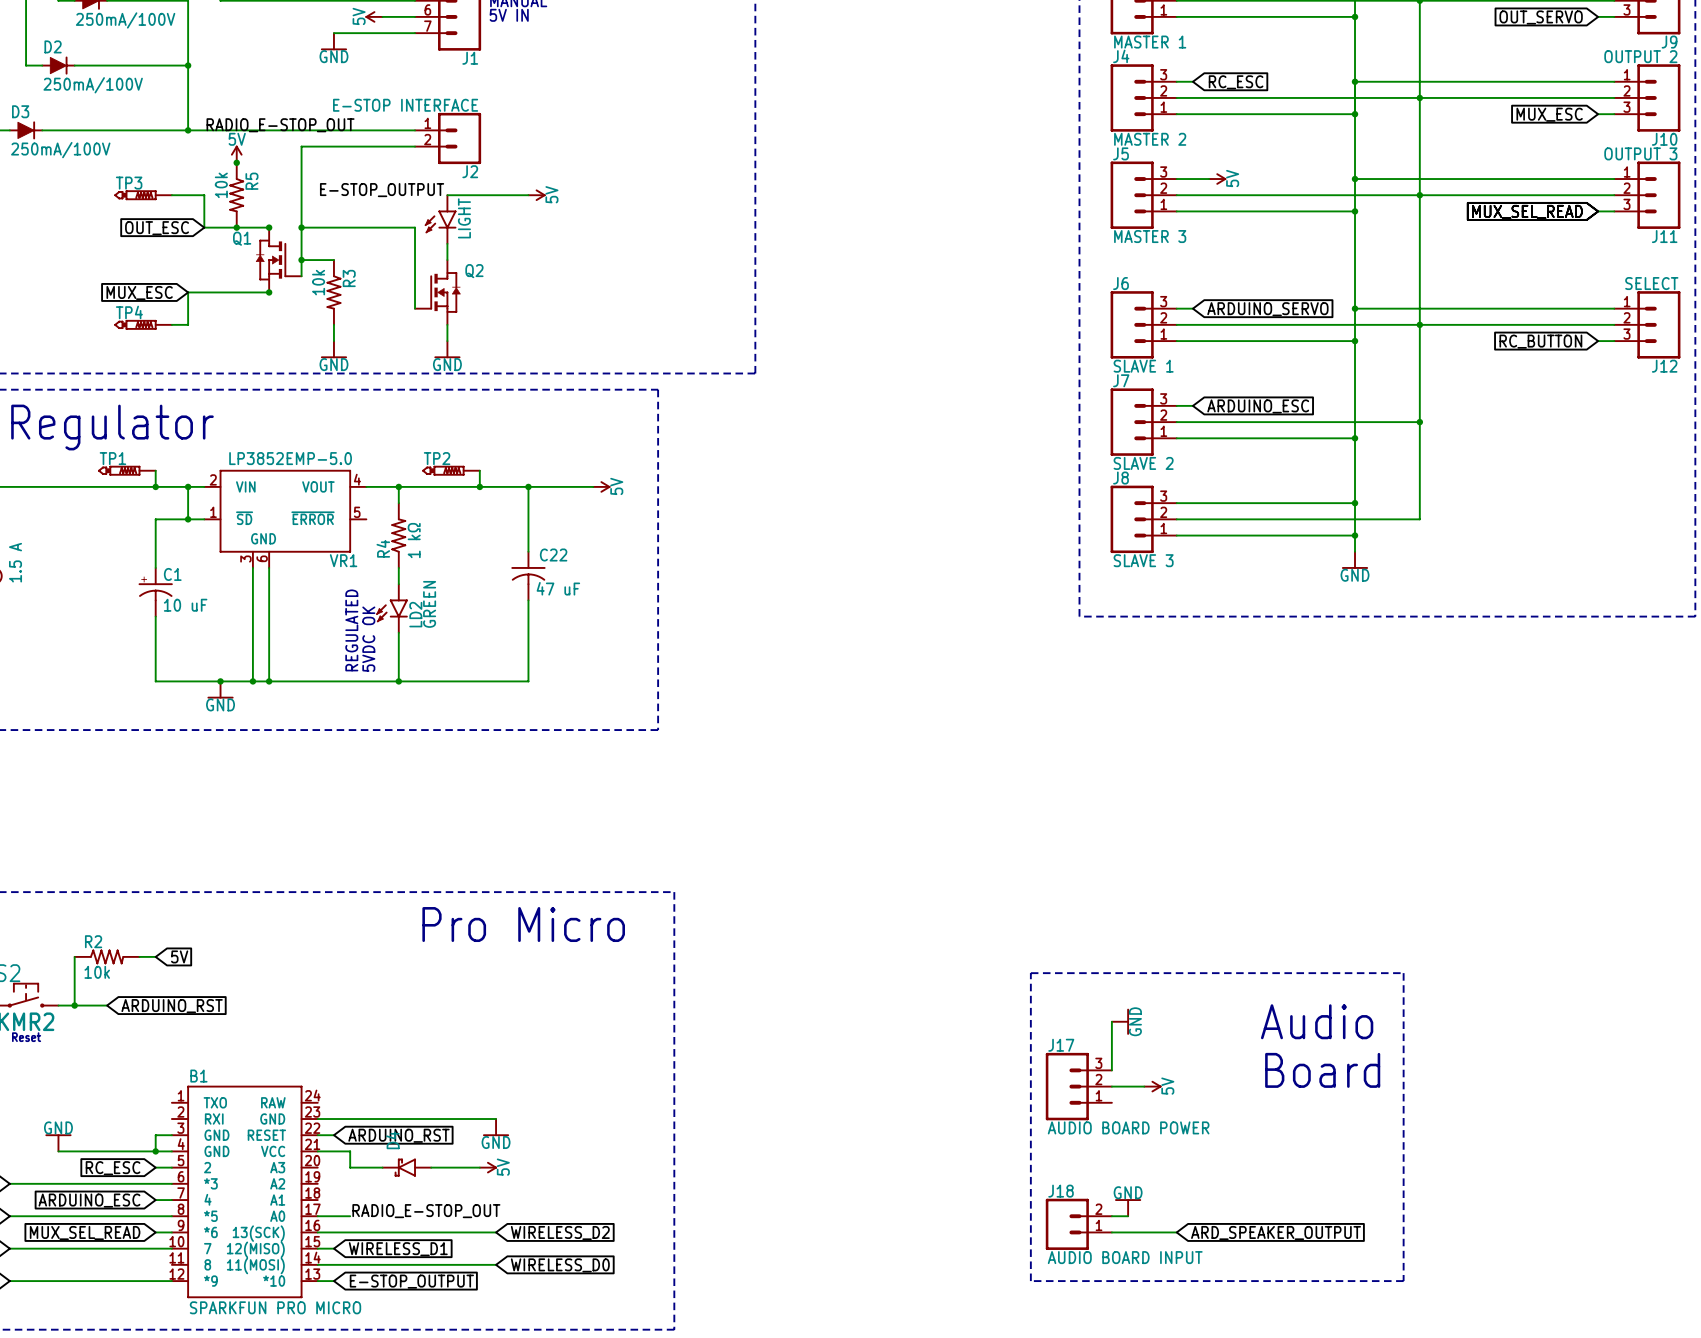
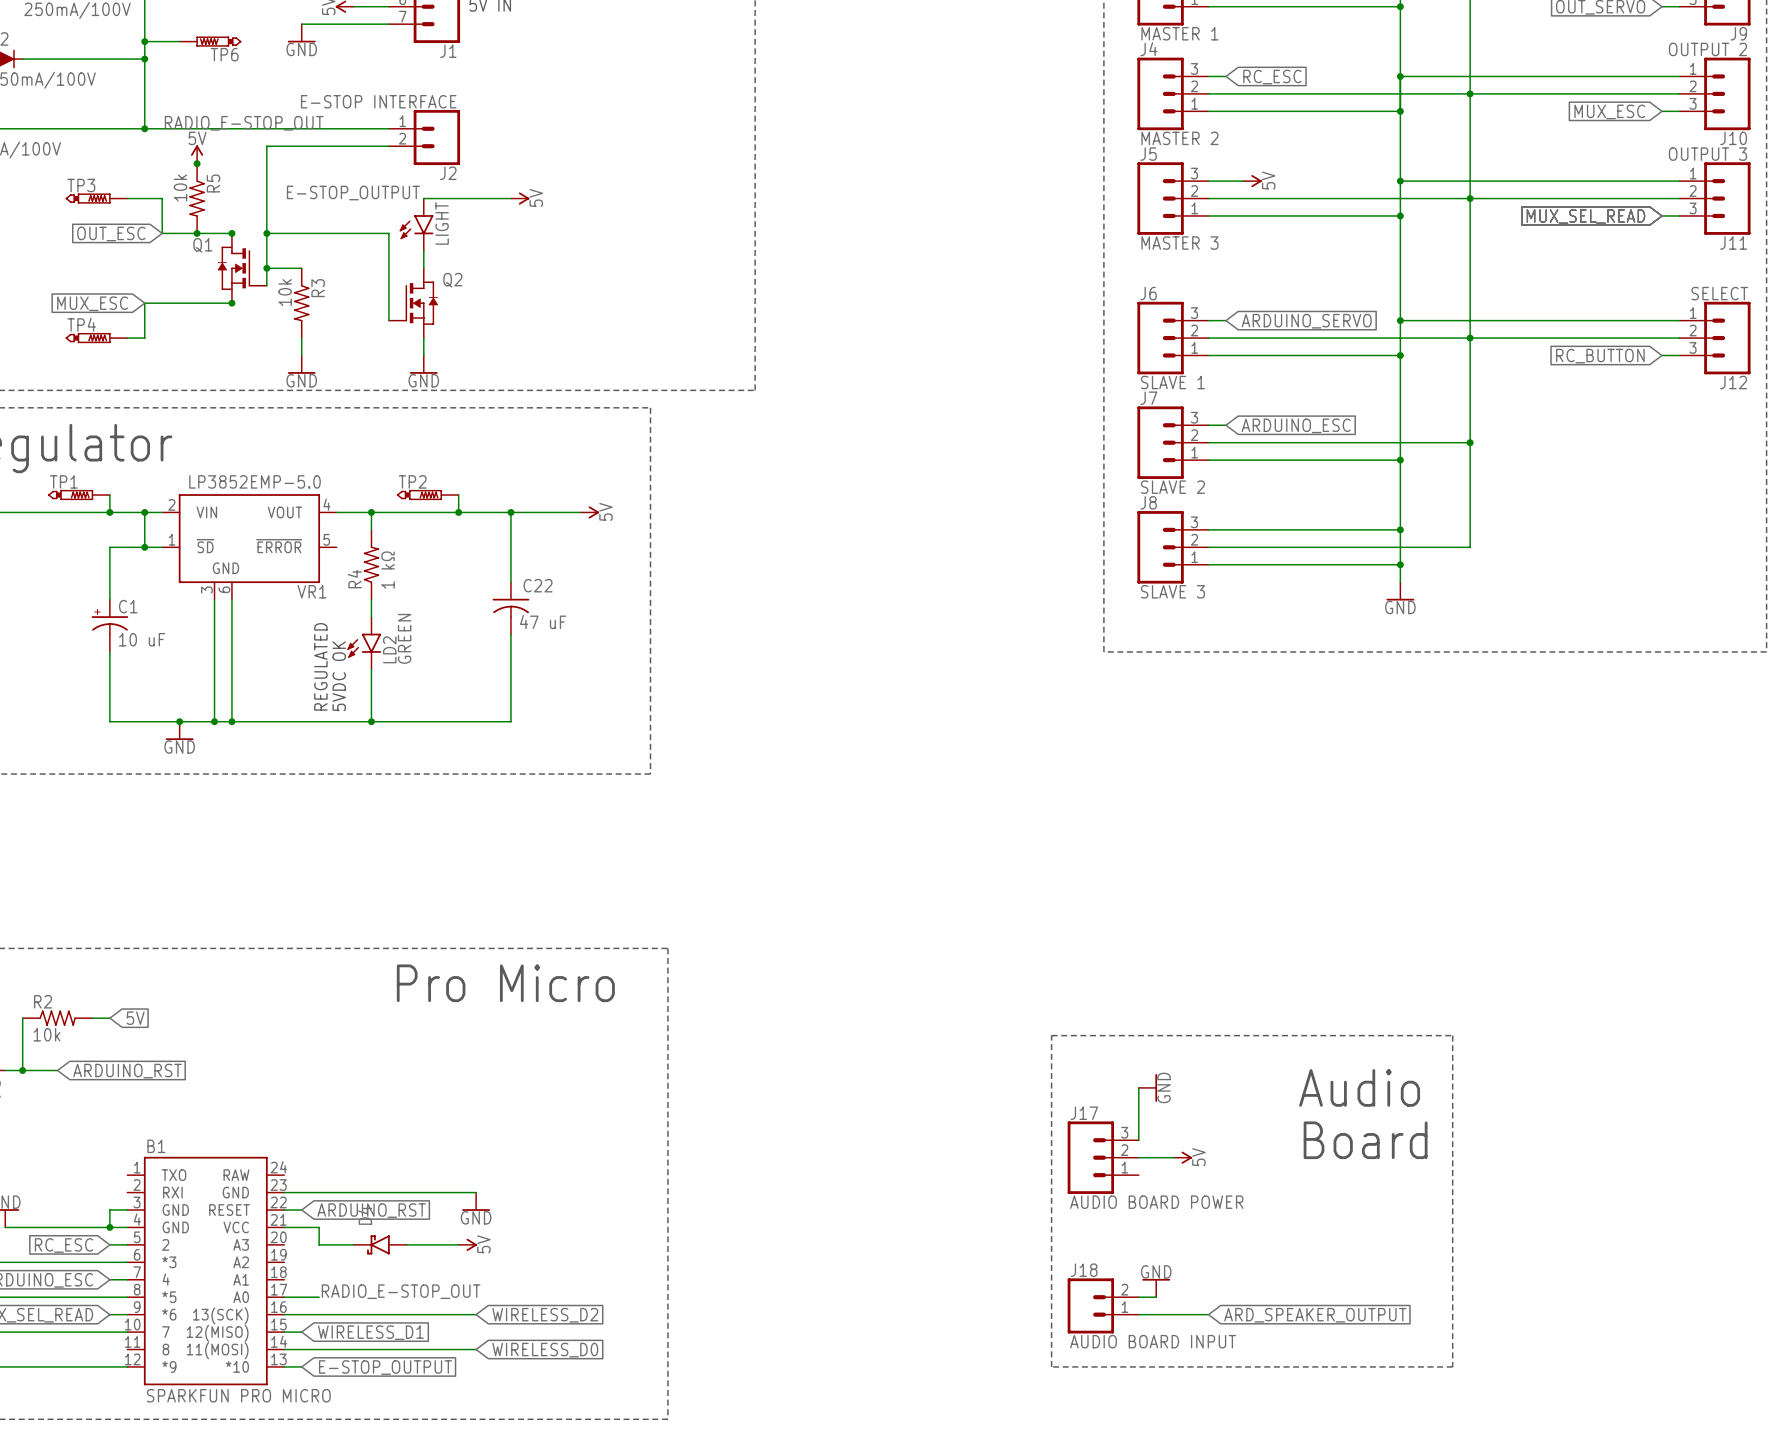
wire: none -> (144, 41) (179, 41)
junction: none -> (144, 41)
TP6: none -> (210, 41)

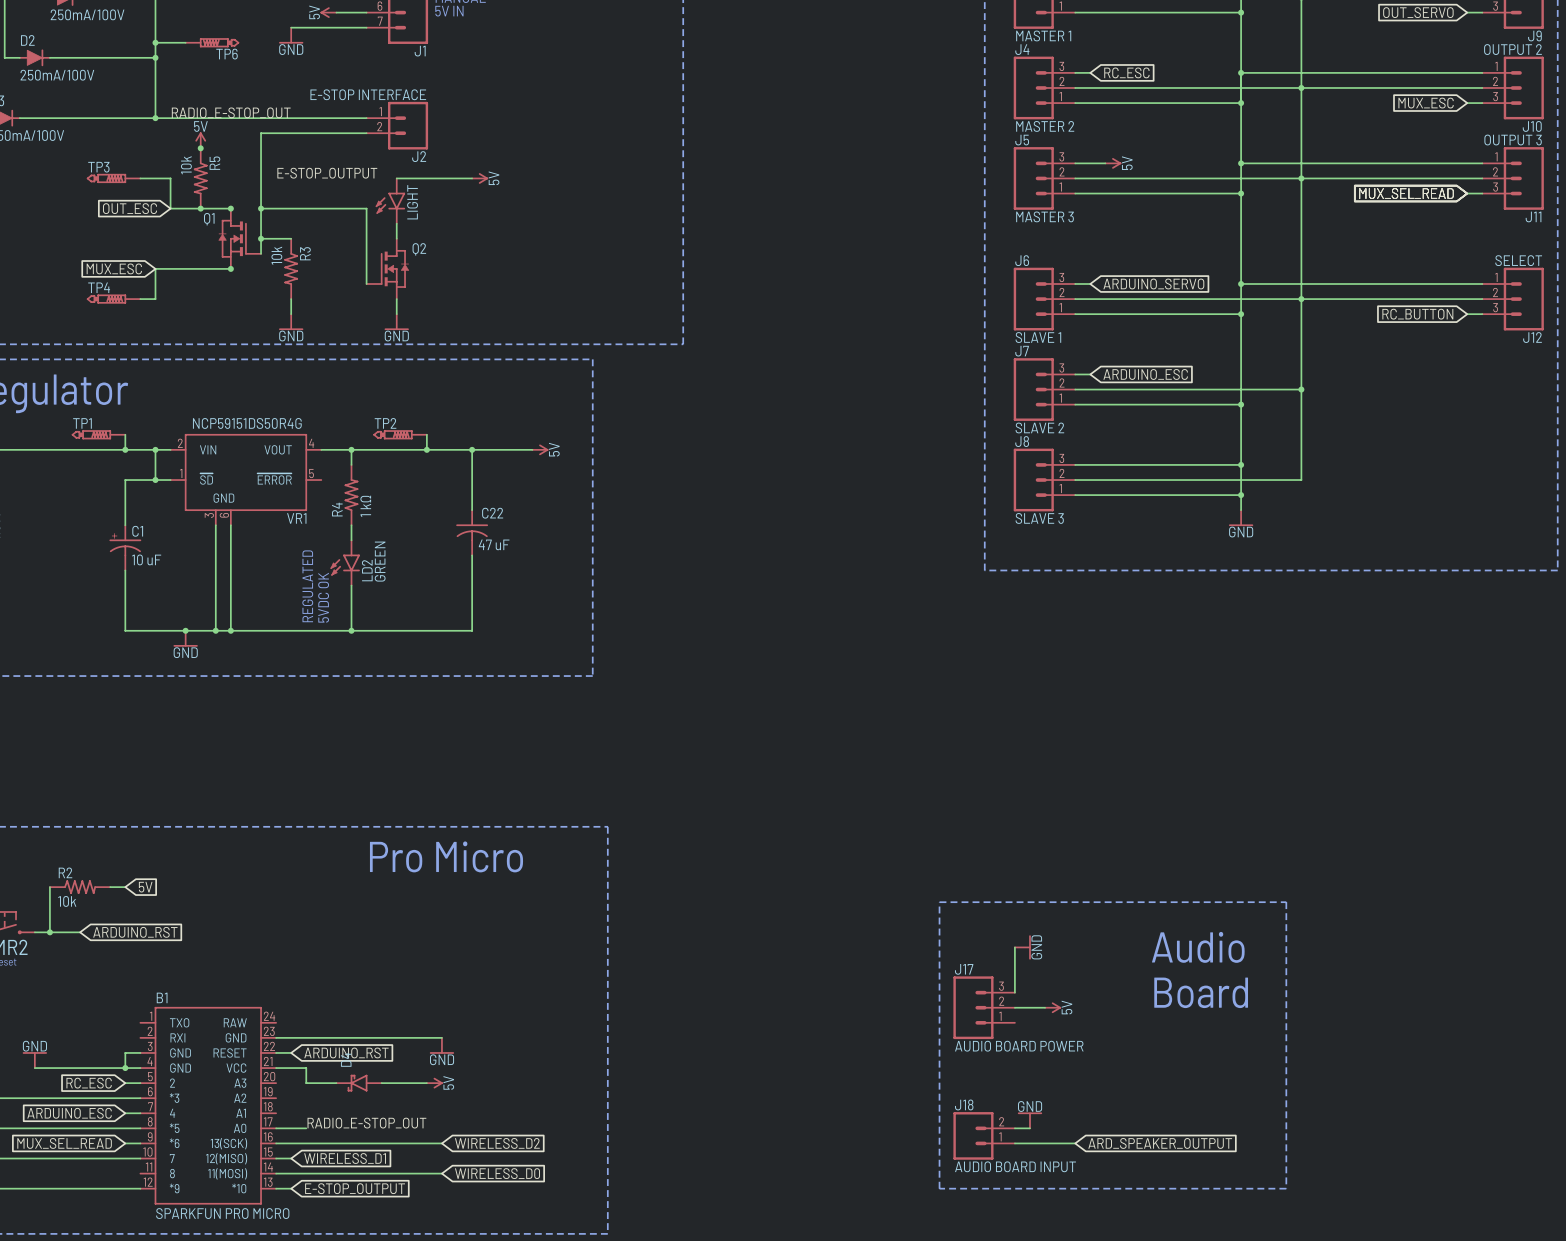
VR1 value: LP3852EMP-5.0 (255, 481) -> NCP59151DS50R4G (247, 423)

